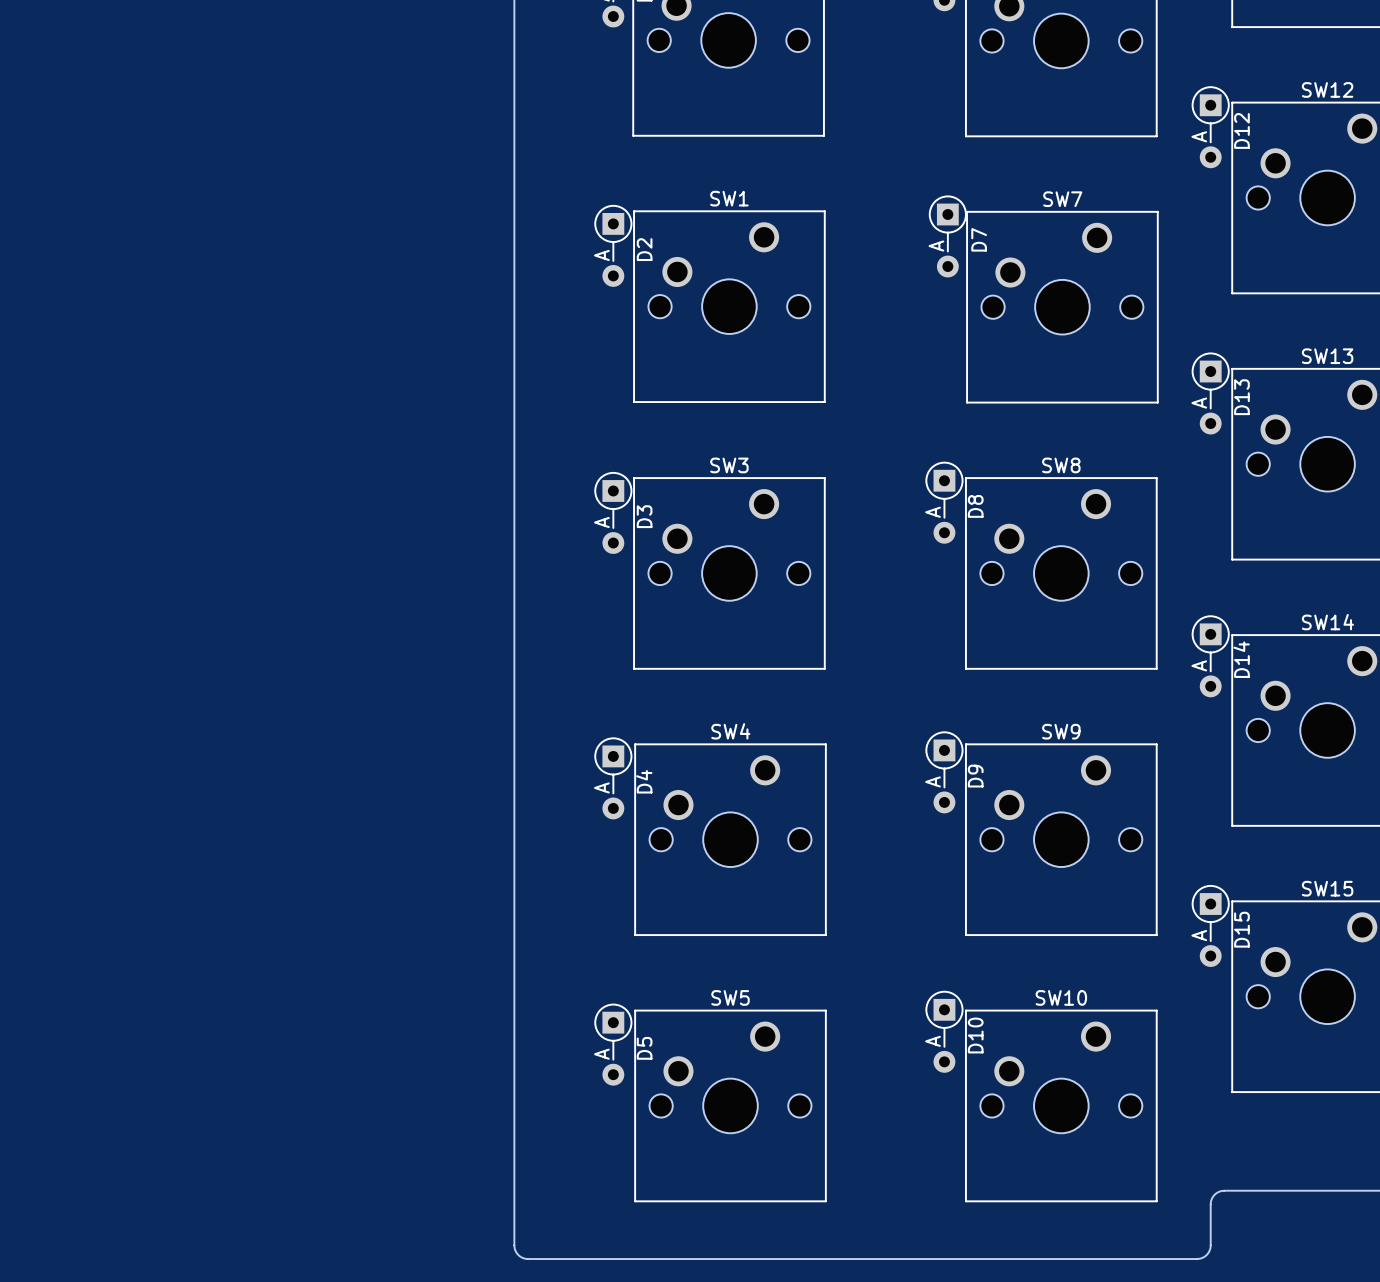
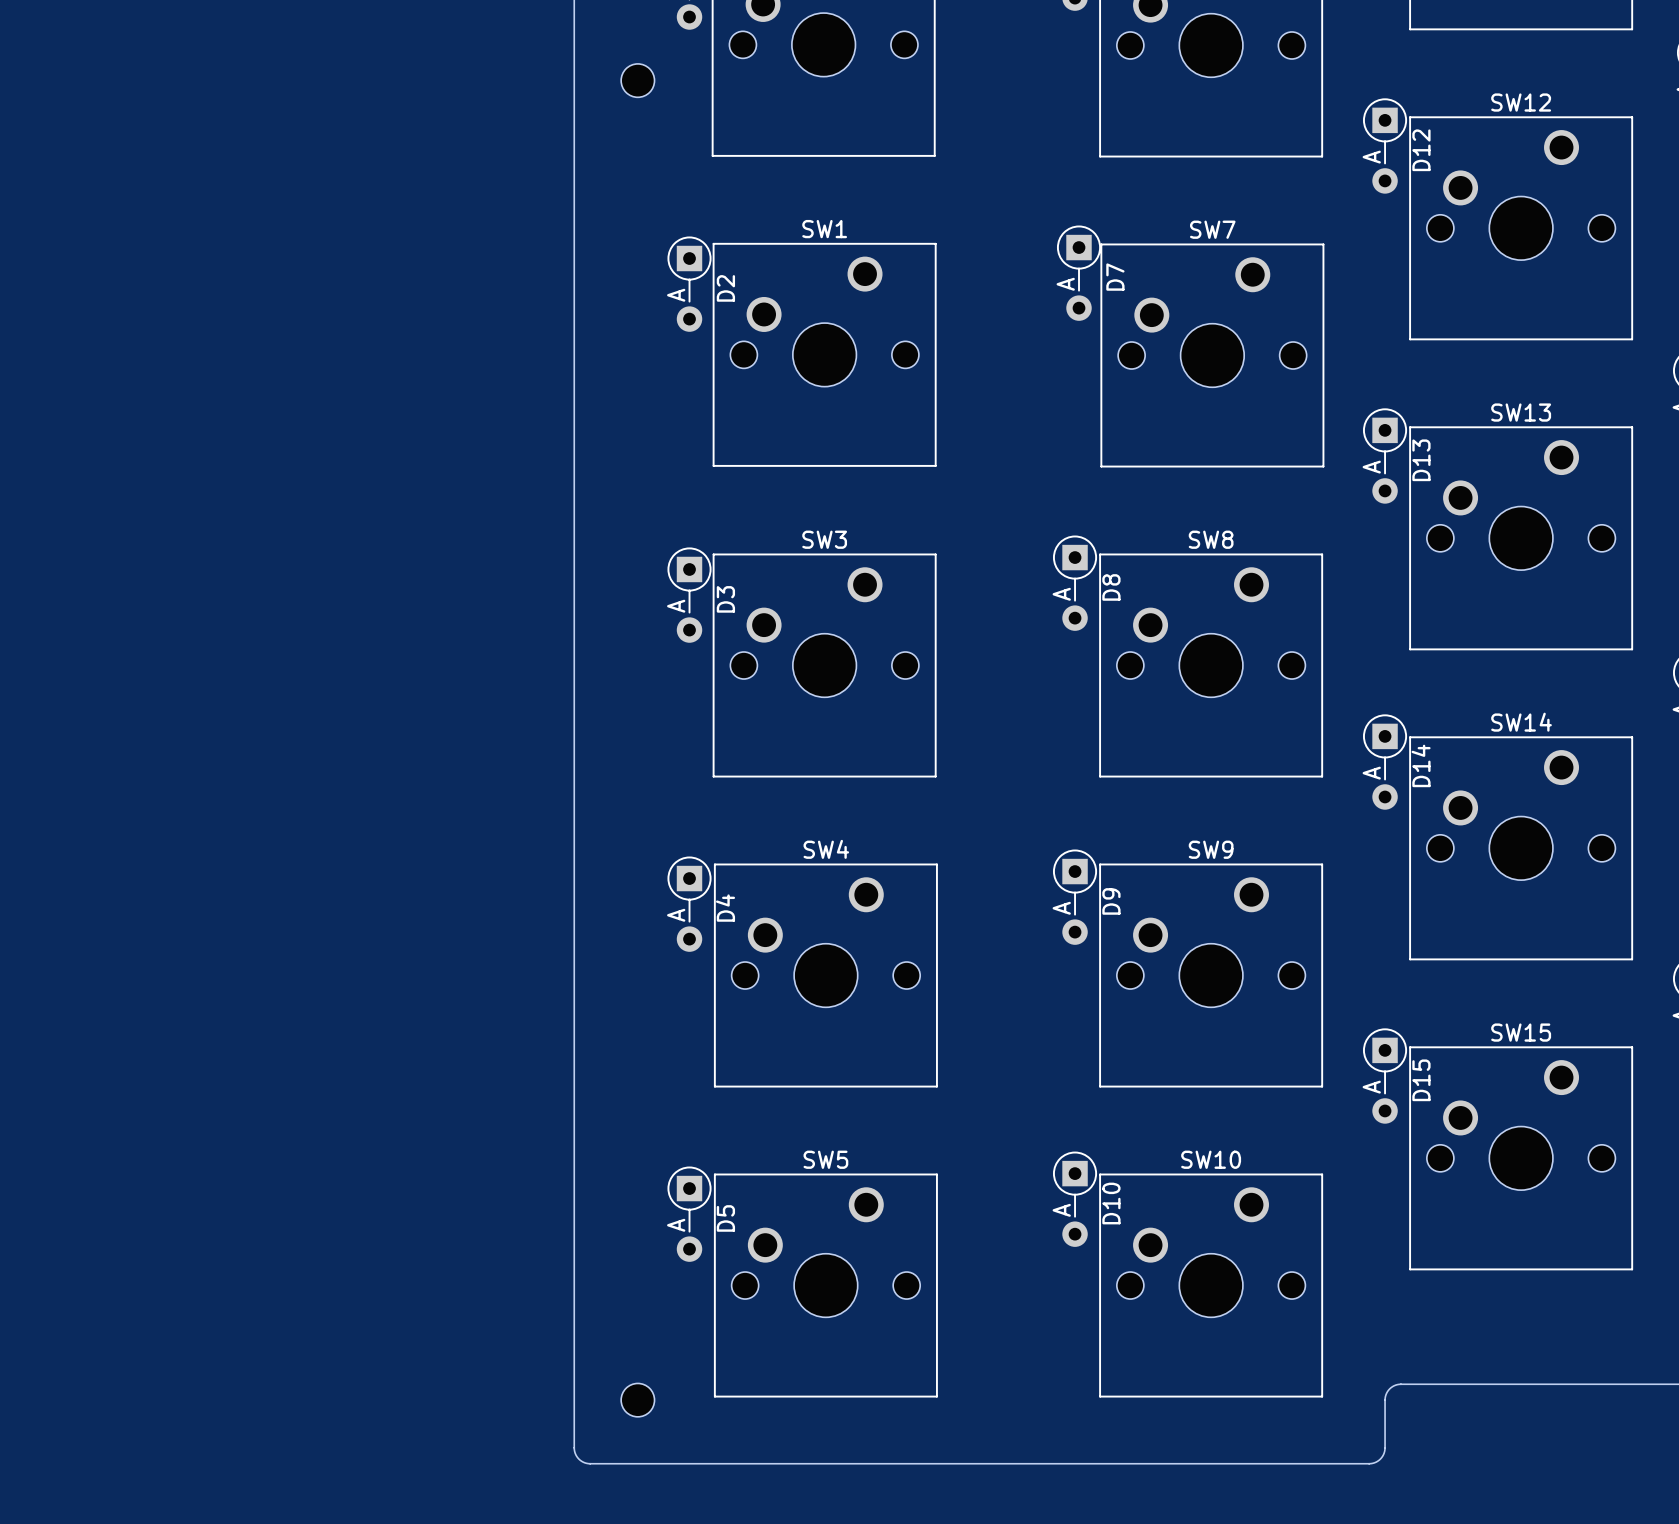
part: none -> (637, 80)
part: none -> (637, 1400)

